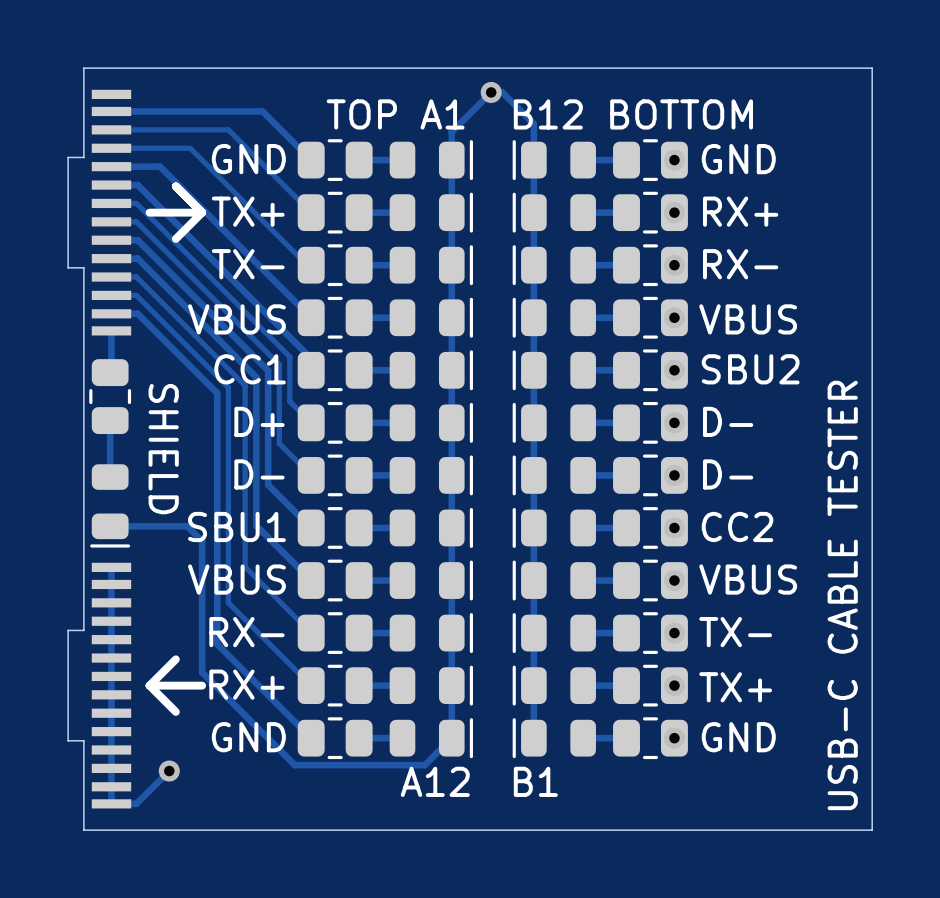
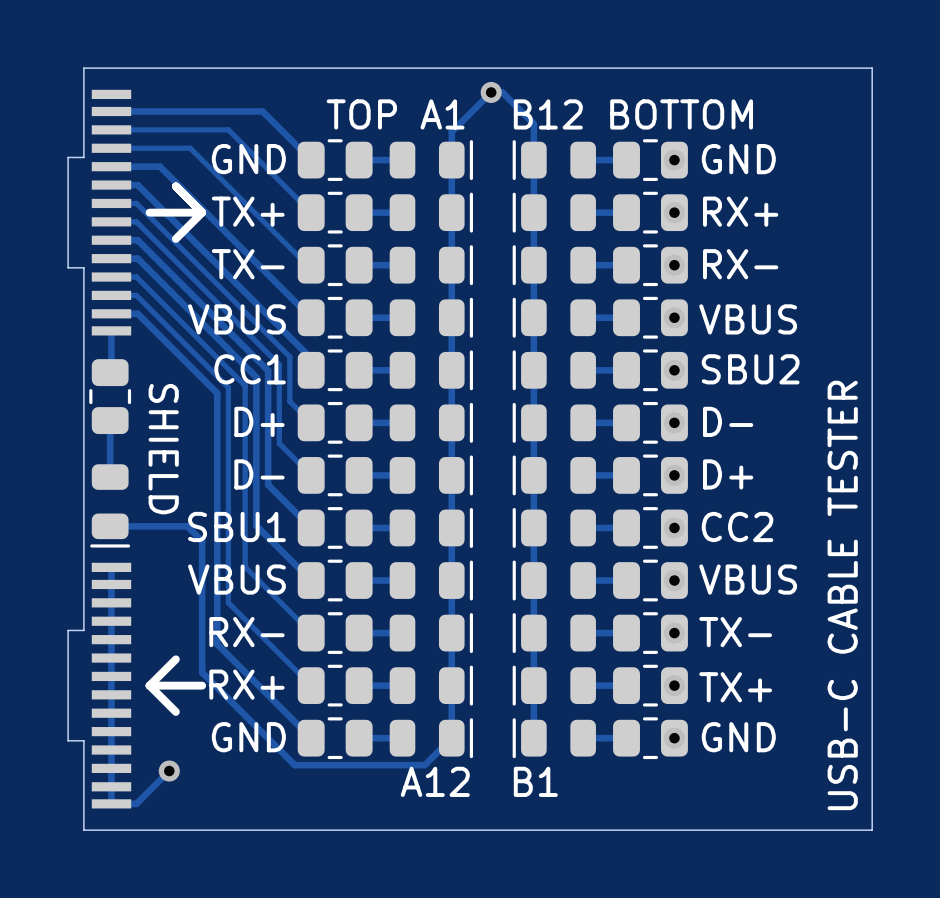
part text: D- (728, 474) -> D+ (728, 474)

